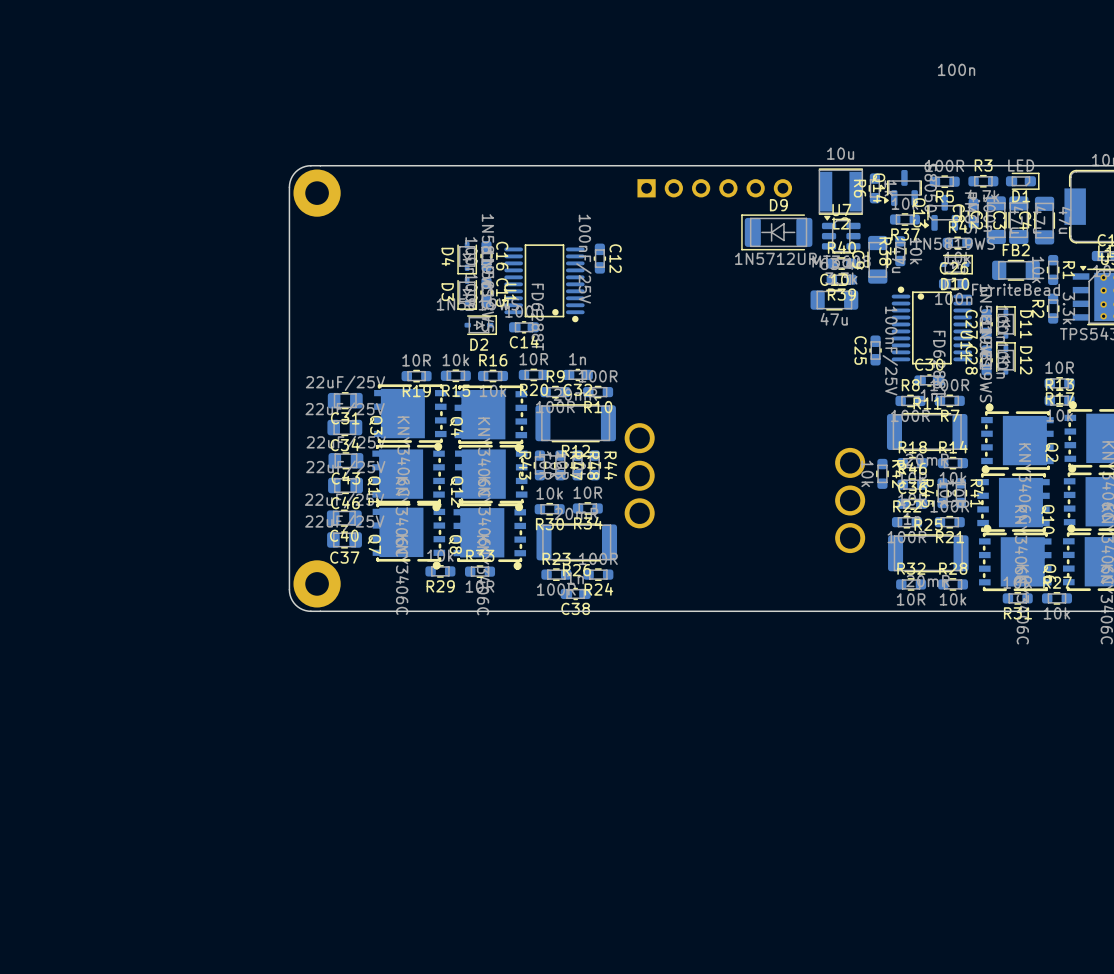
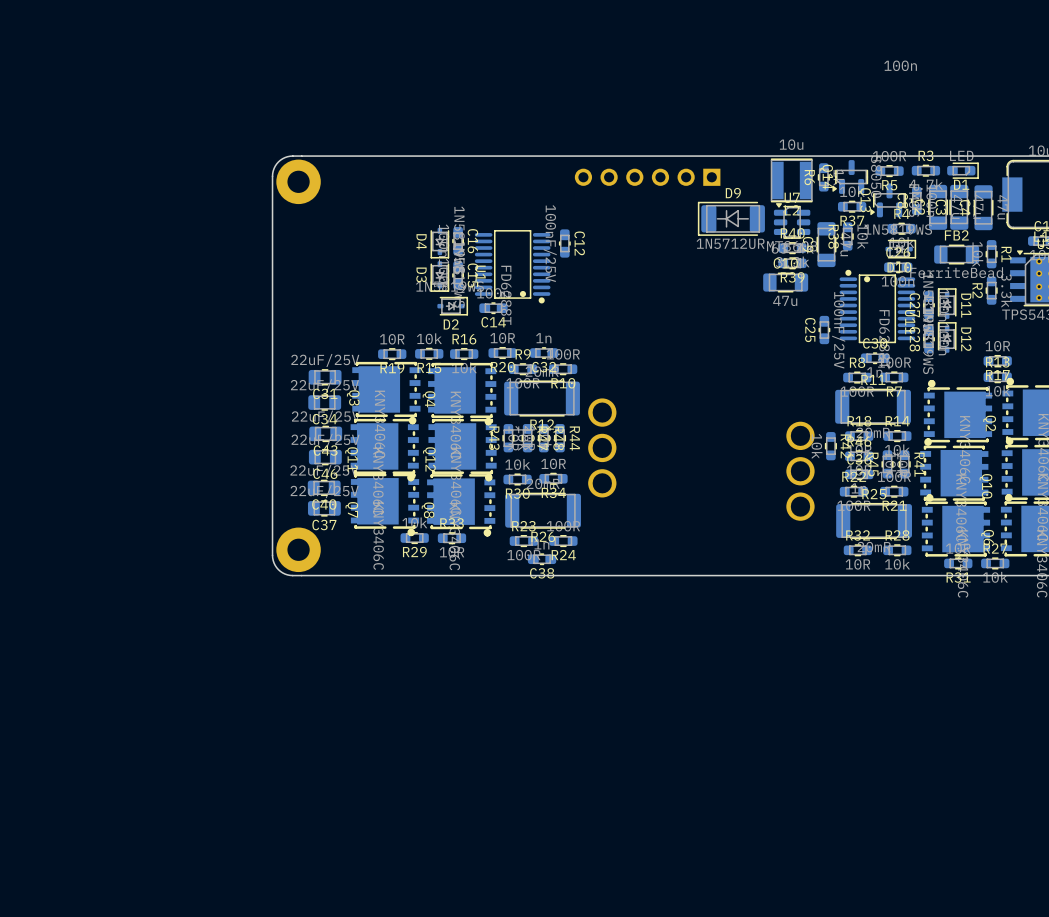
part rotation: 0° (714, 188) -> 180° (647, 177)

